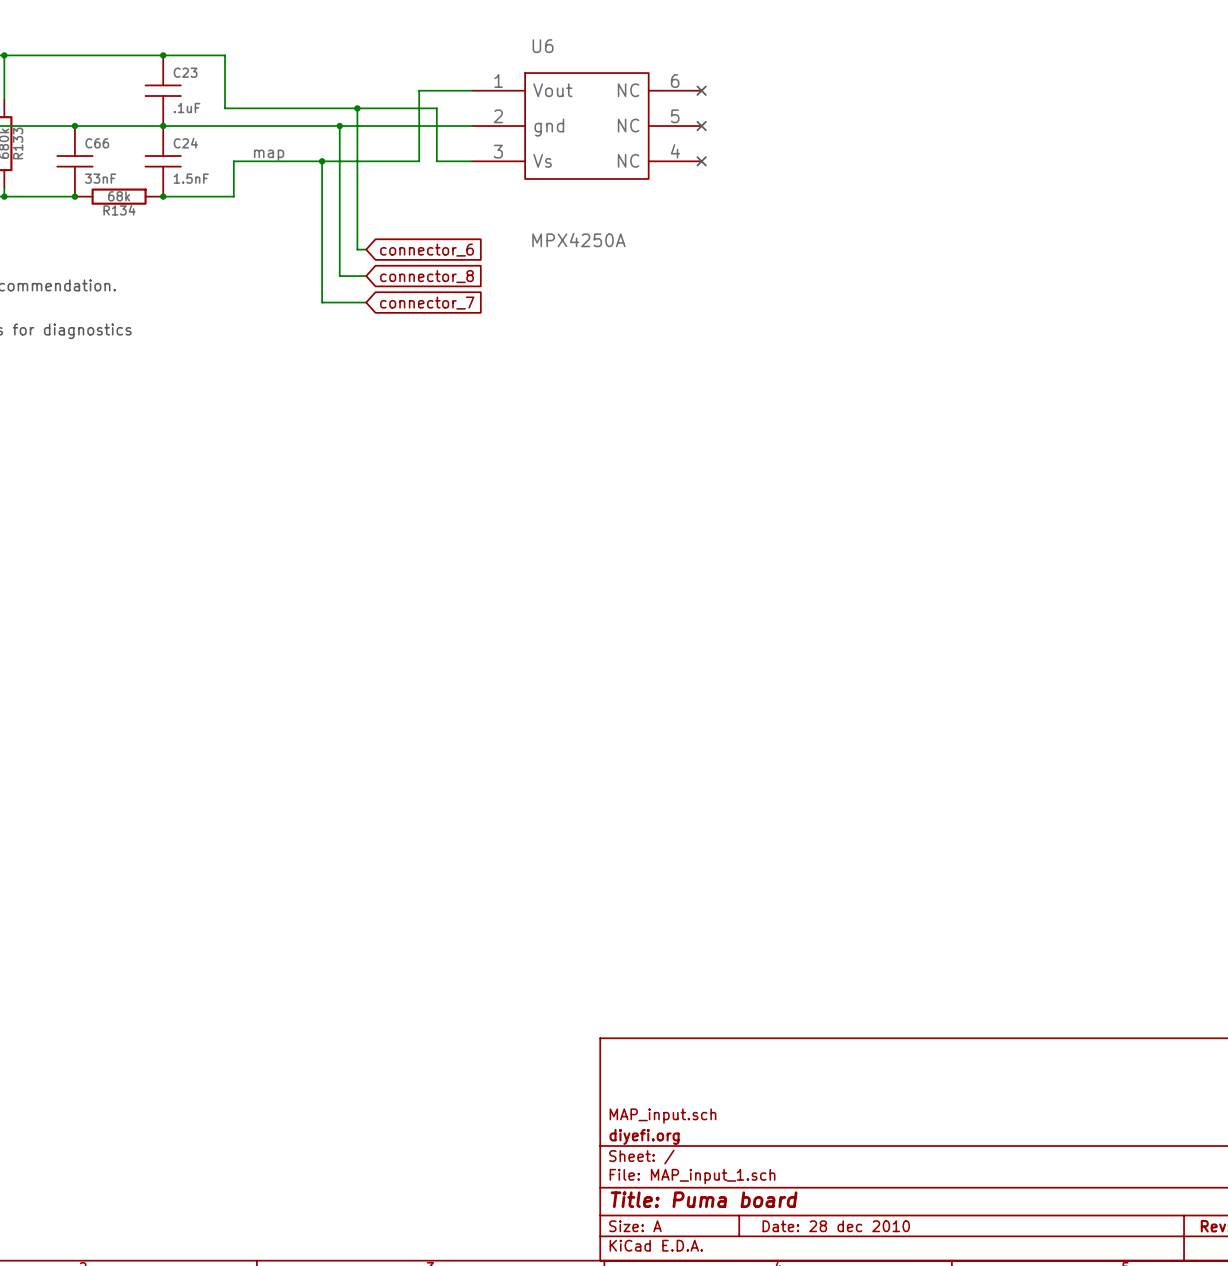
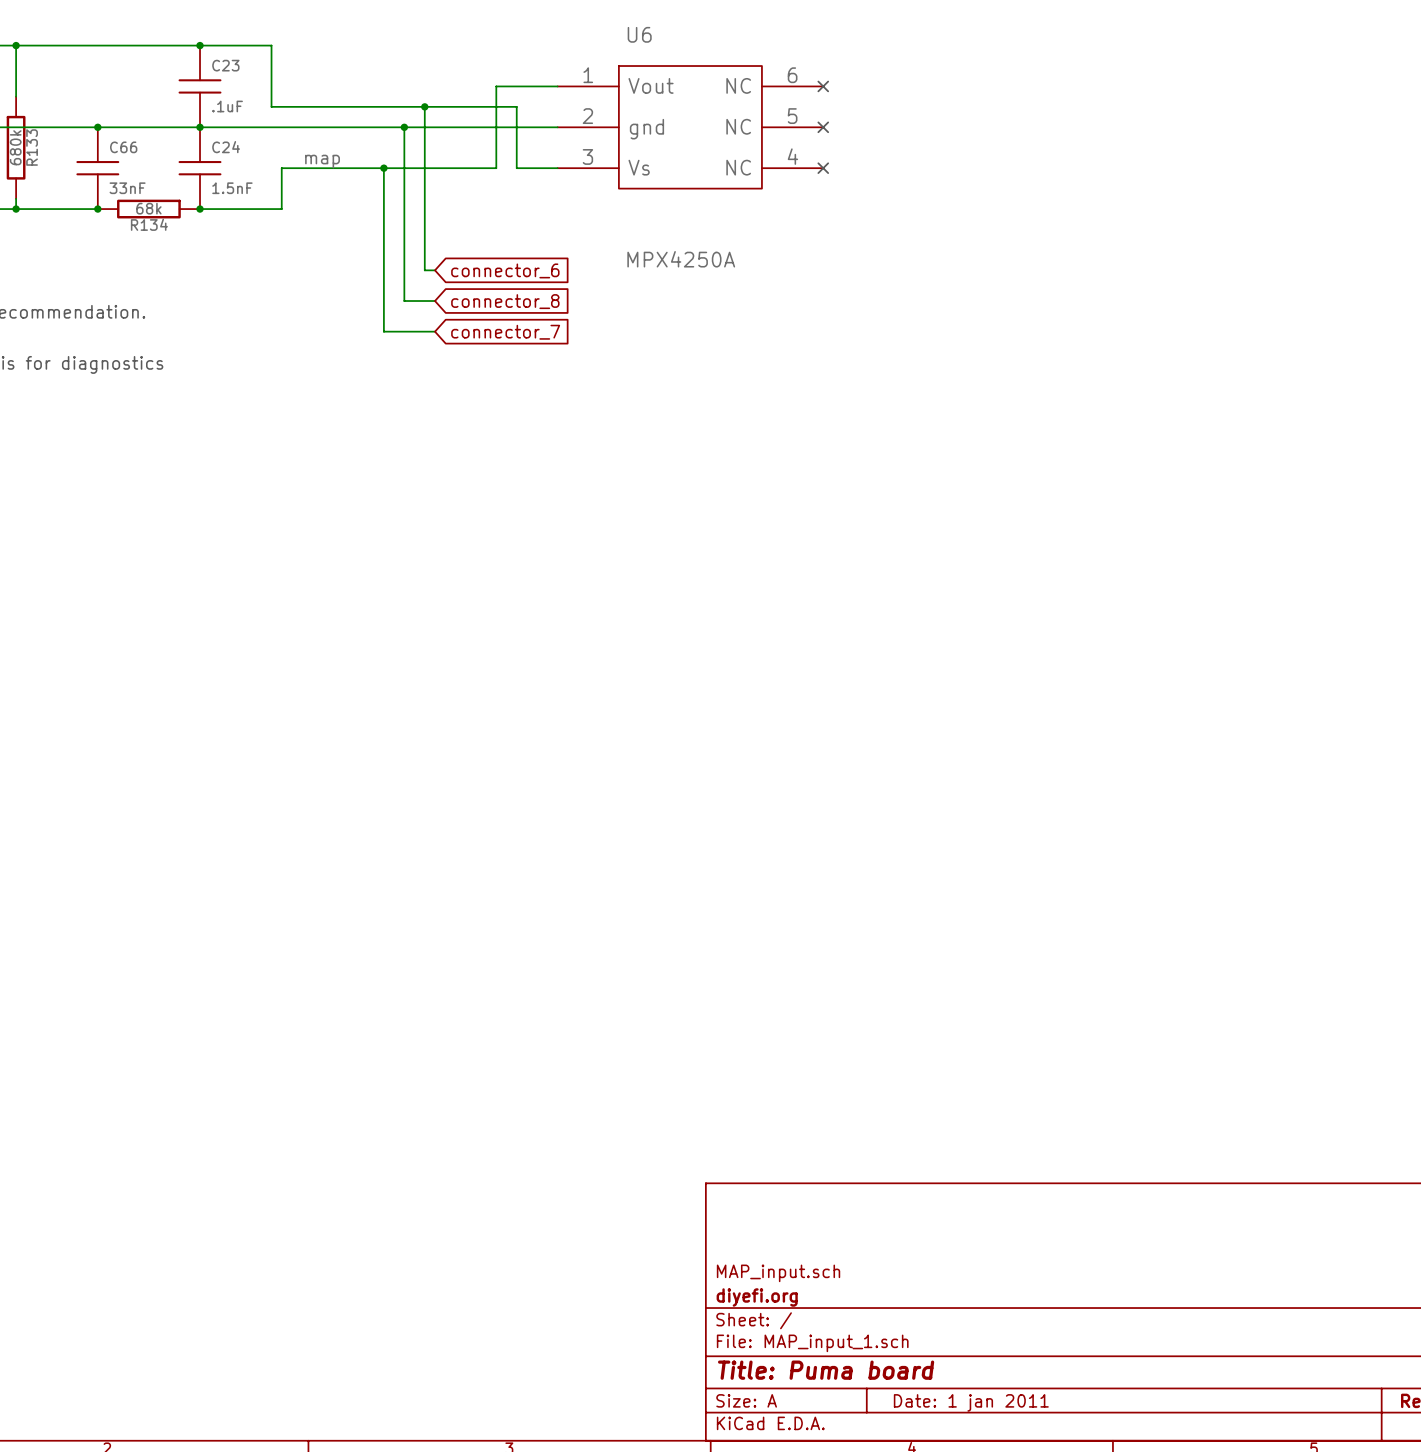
title block: Date: 28 dec 2010 (836, 1226) -> Date: 1 jan 2011 (971, 1402)

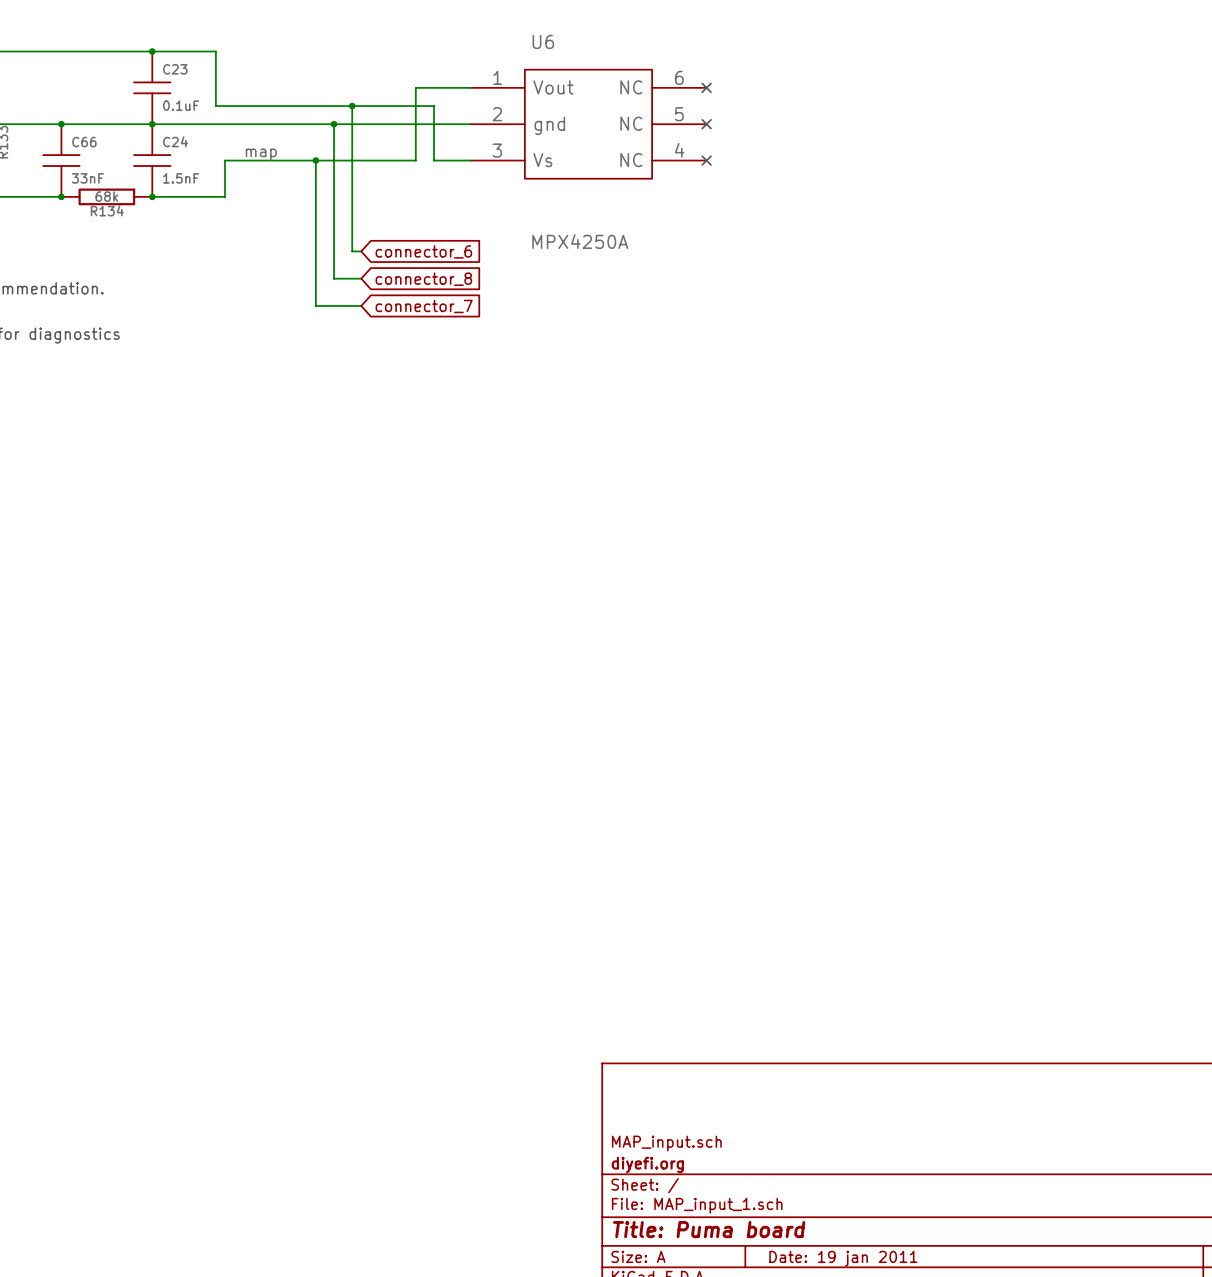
C23 value: .1uF (227, 106) -> 0.1uF (181, 105)
title block: Date: 1 jan 2011 (971, 1402) -> Date: 19 jan 2011 (843, 1258)

